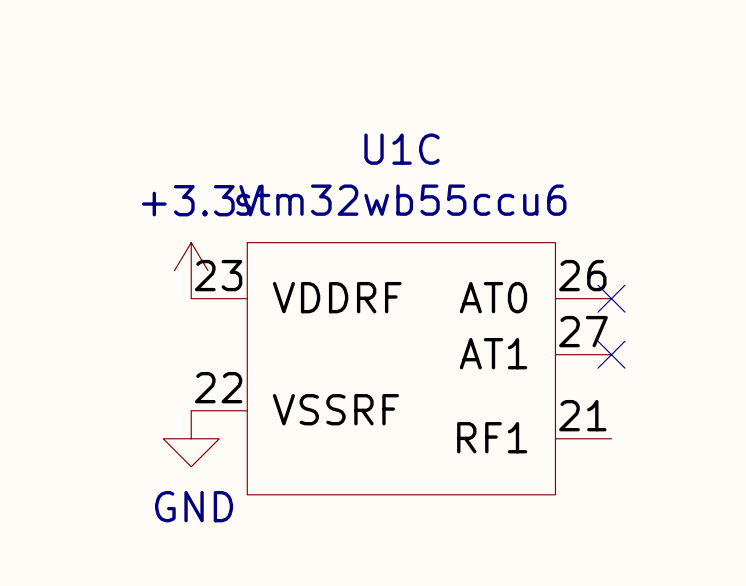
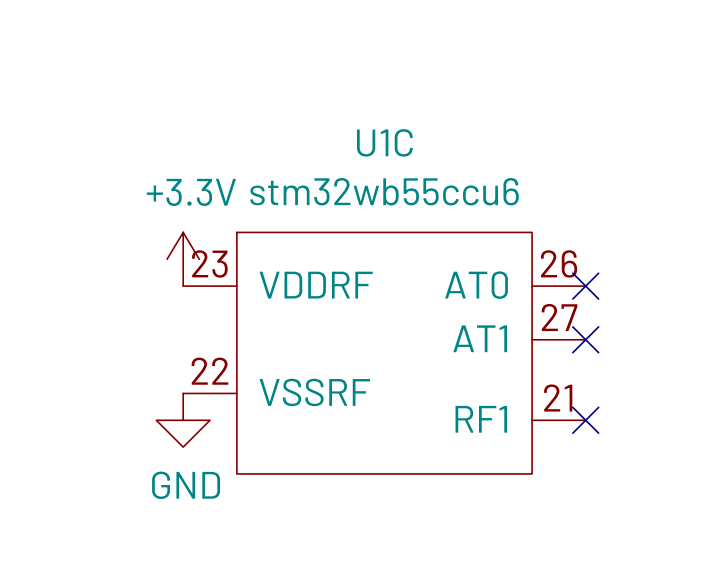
no-connect mark: none -> (585, 420)

